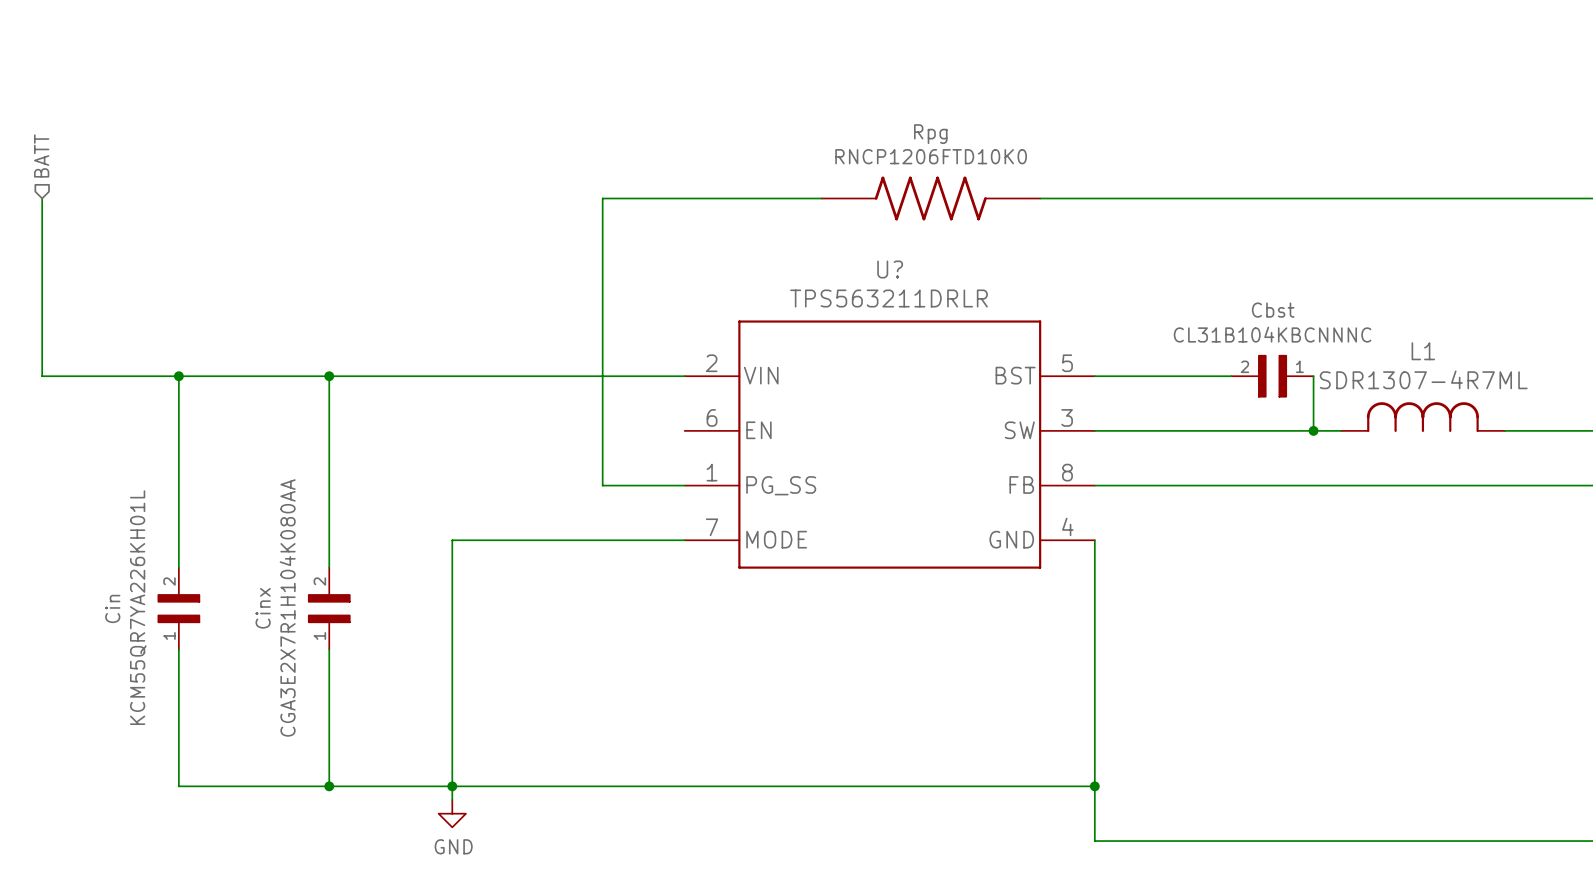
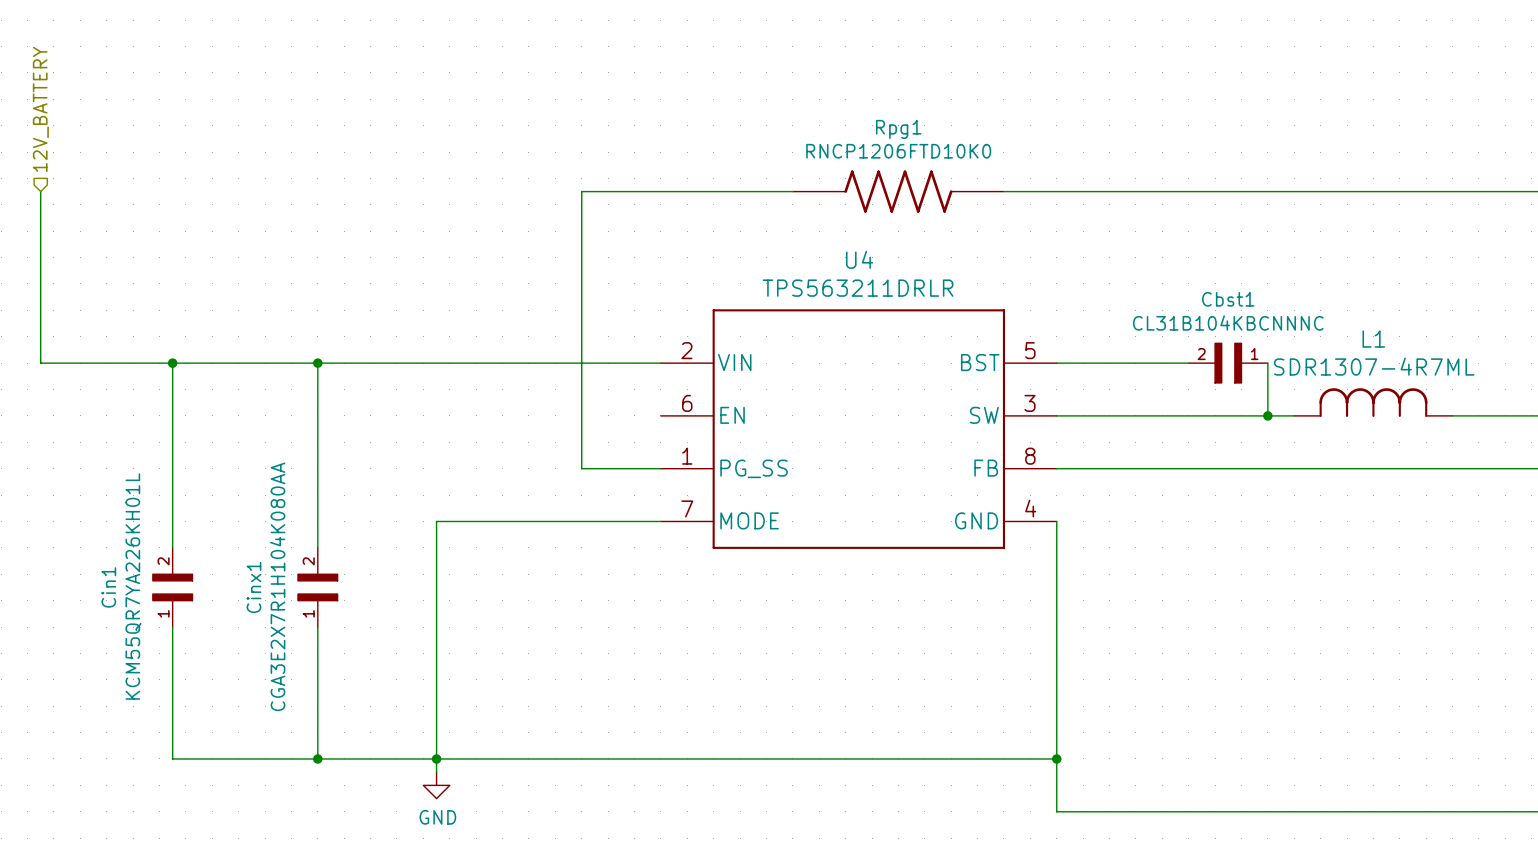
Rpg name: Rpg (930, 134) -> Rpg1 (898, 129)
hierarchical label: BATT (41, 155) -> 12V_BATTERY (40, 109)
U? name: U? (890, 269) -> U4 (859, 259)
Cbst name: Cbst (1273, 310) -> Cbst1 (1228, 299)
Cin name: Cin (112, 608) -> Cin1 (108, 587)
Cinx name: Cinx (263, 608) -> Cinx1 (253, 587)

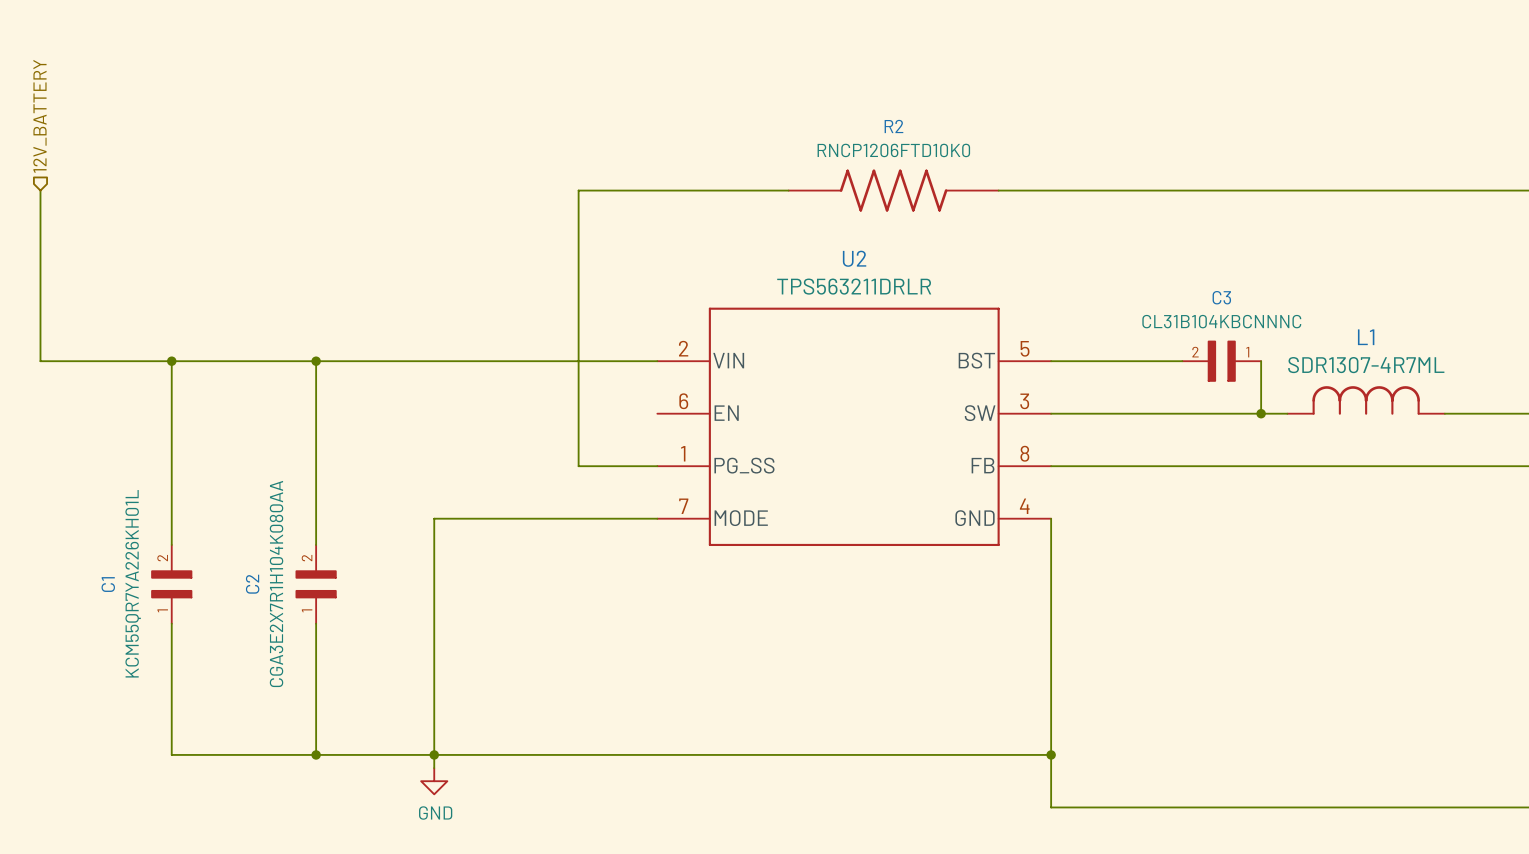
Rpg1 name: Rpg1 (898, 129) -> R2 (893, 126)
U4 name: U4 (859, 259) -> U2 (854, 258)
Cbst1 name: Cbst1 (1228, 299) -> C3 (1221, 297)
Cin1 name: Cin1 (108, 587) -> C1 (108, 584)
Cinx1 name: Cinx1 (253, 587) -> C2 (252, 584)

